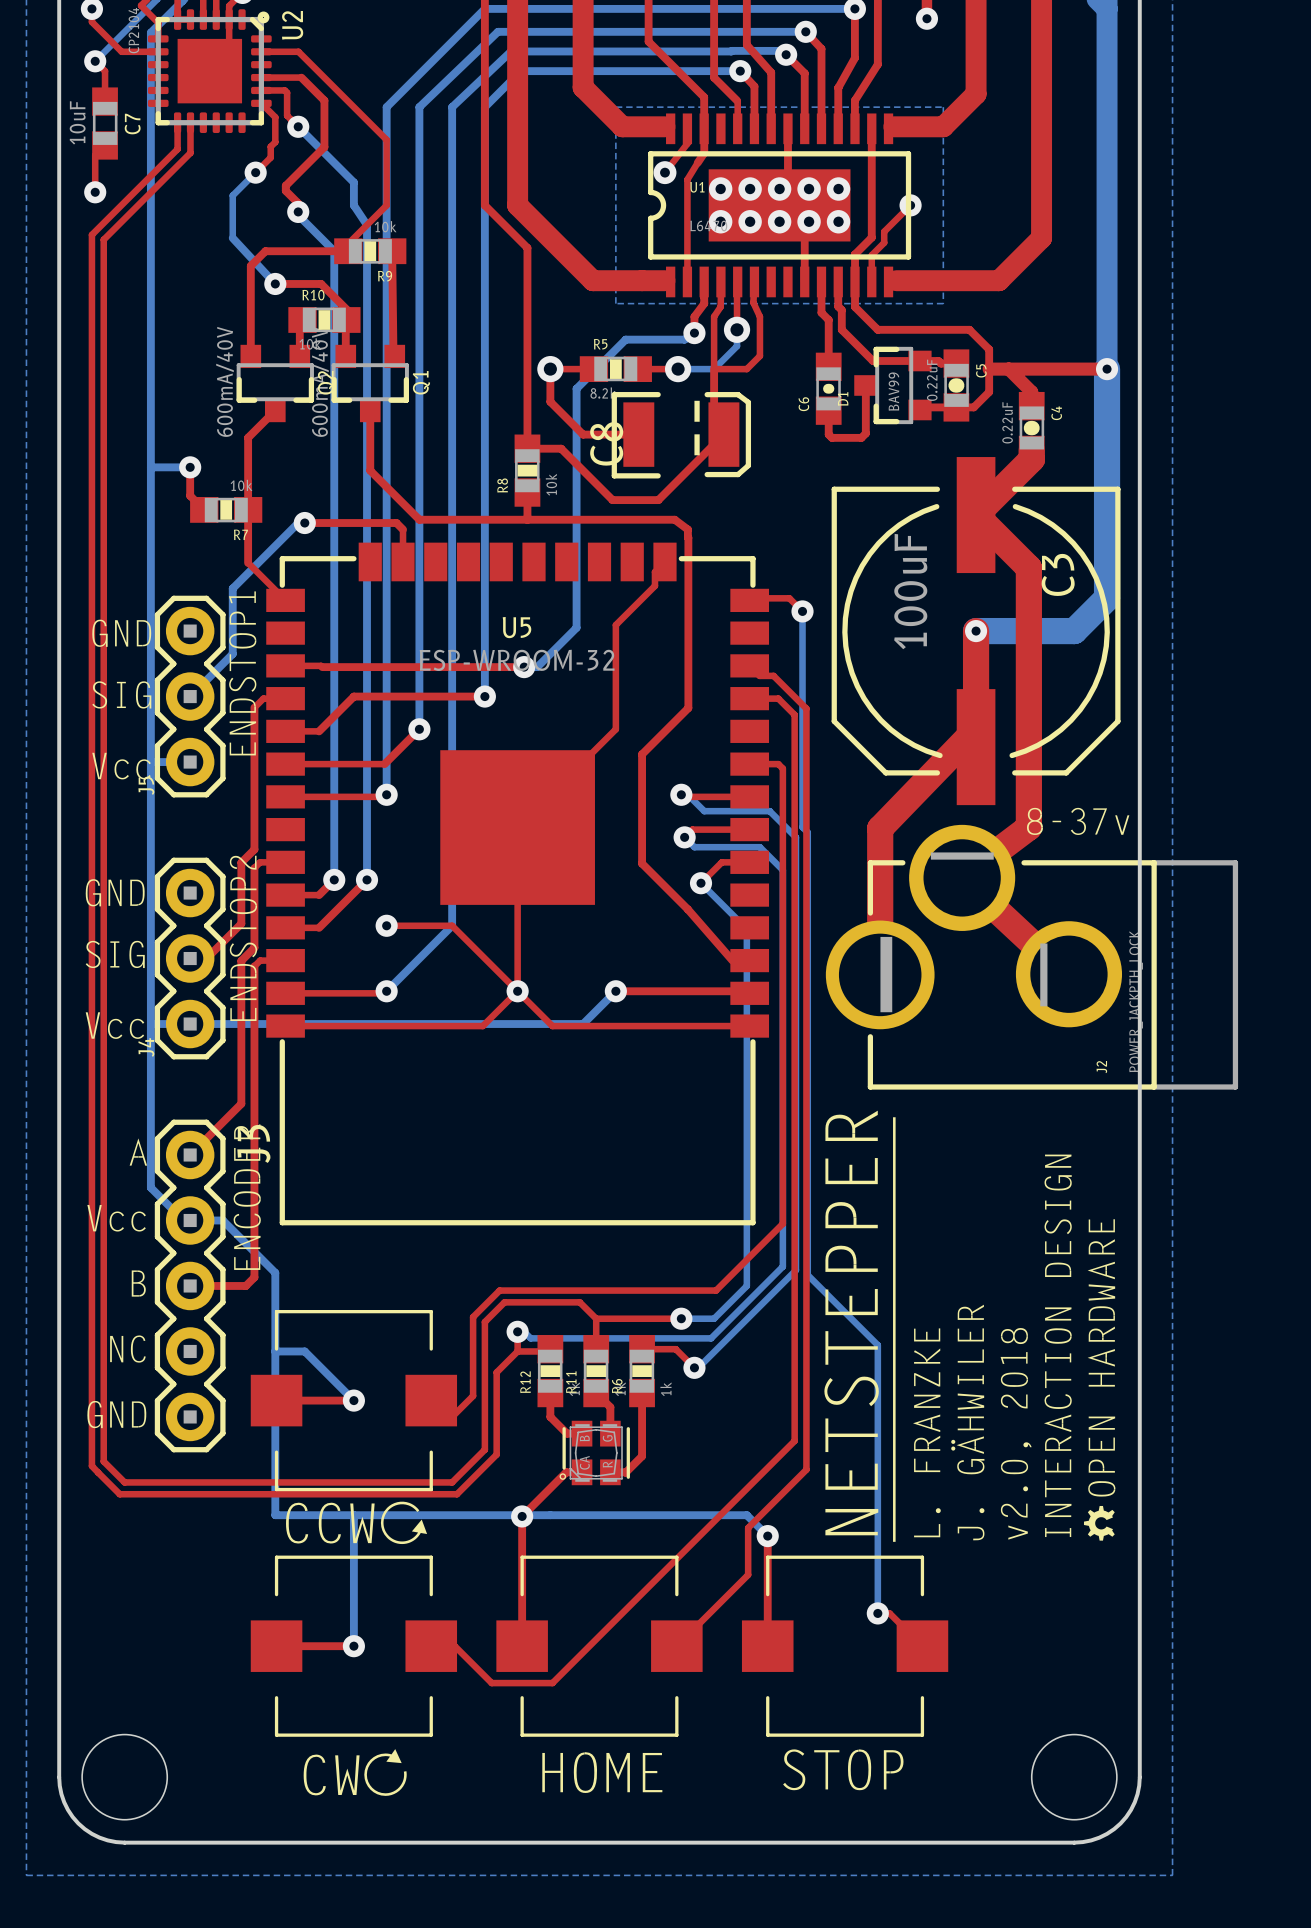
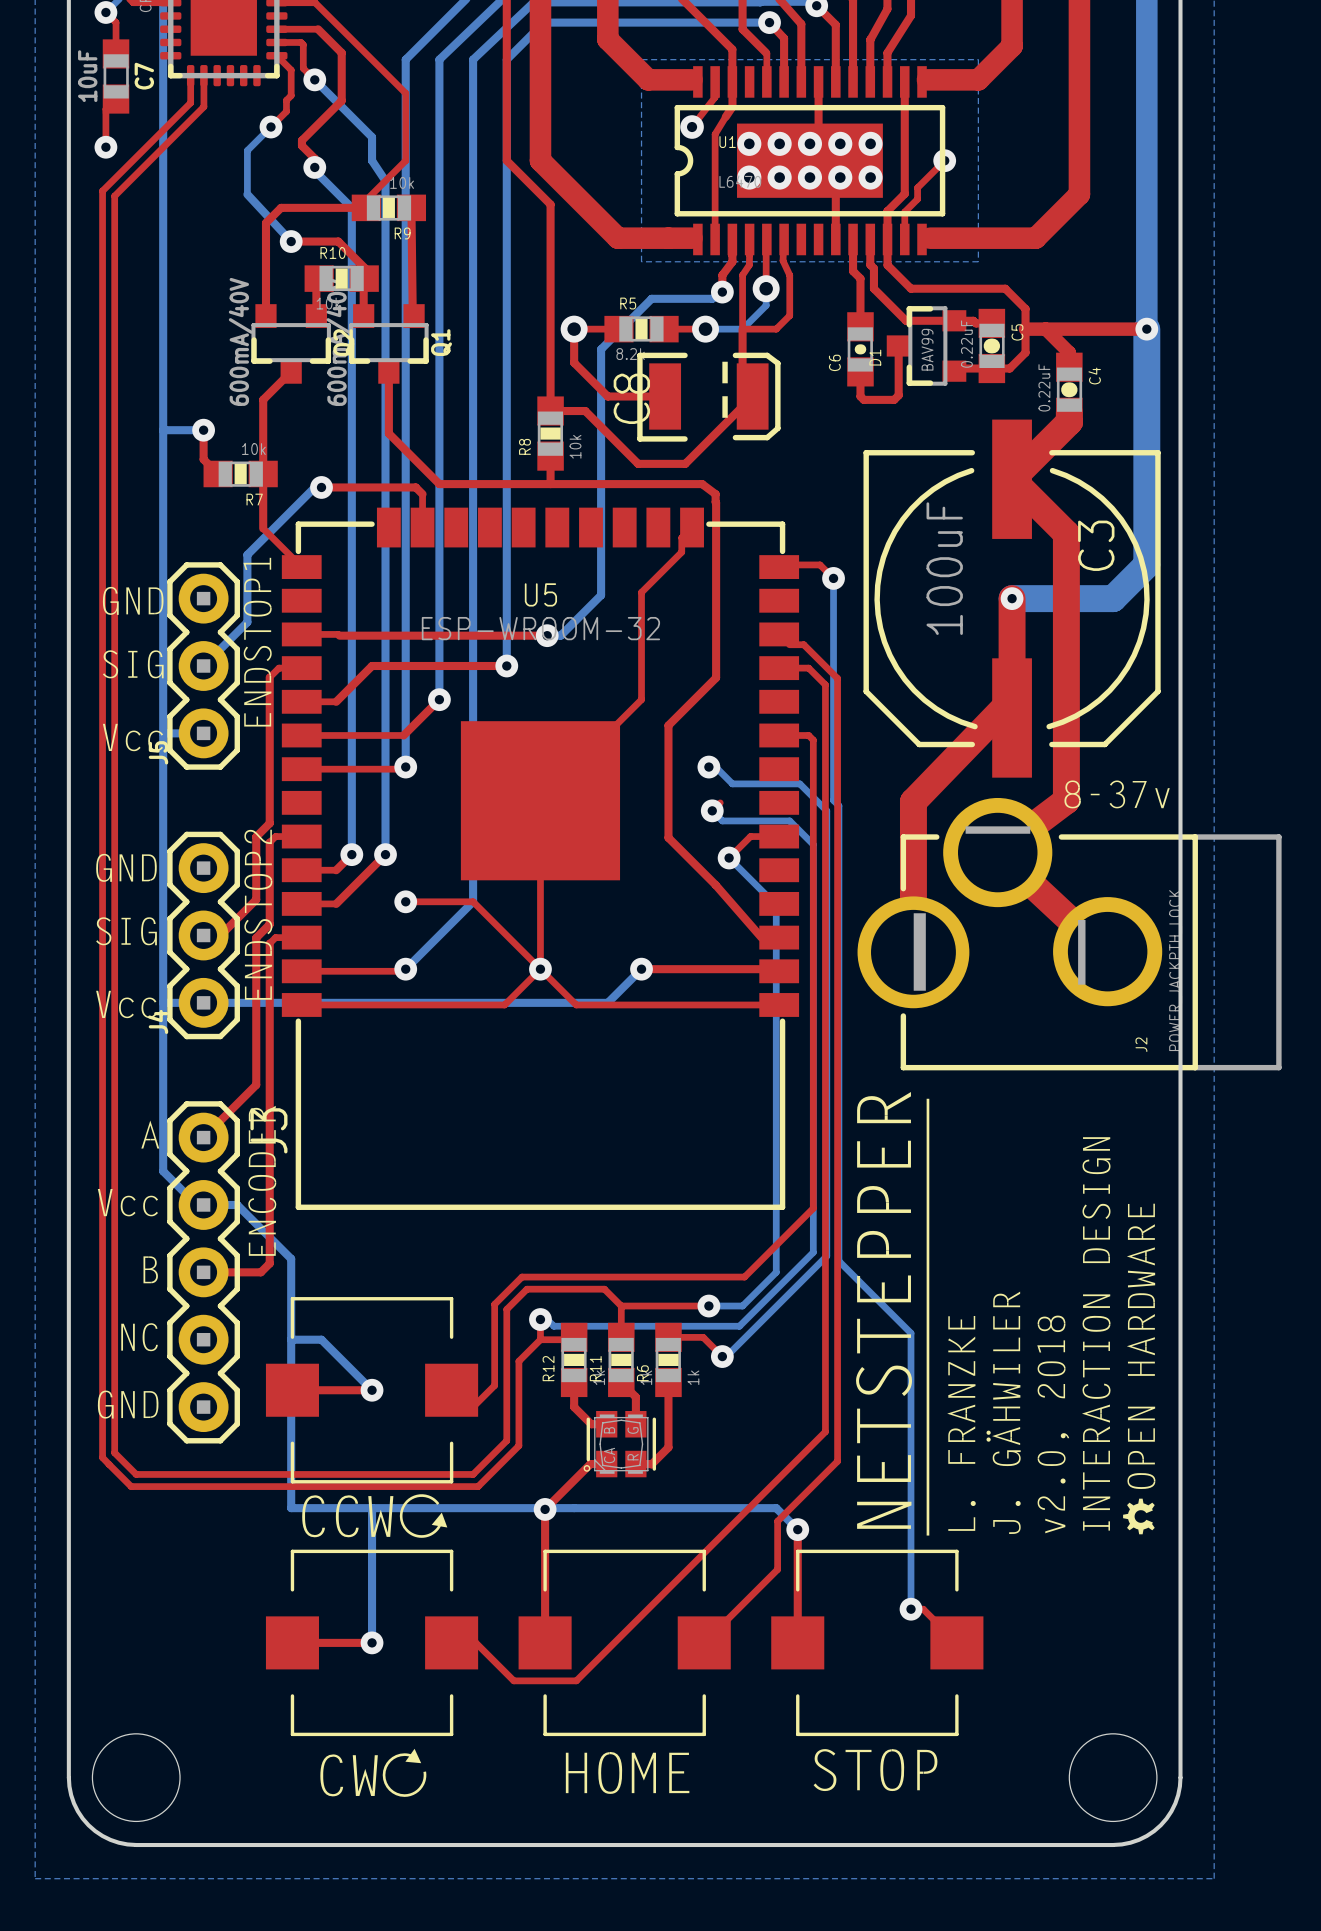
top track: (686, 796) (749, 796) -> none
top track: (692, 829) (749, 829) -> none

